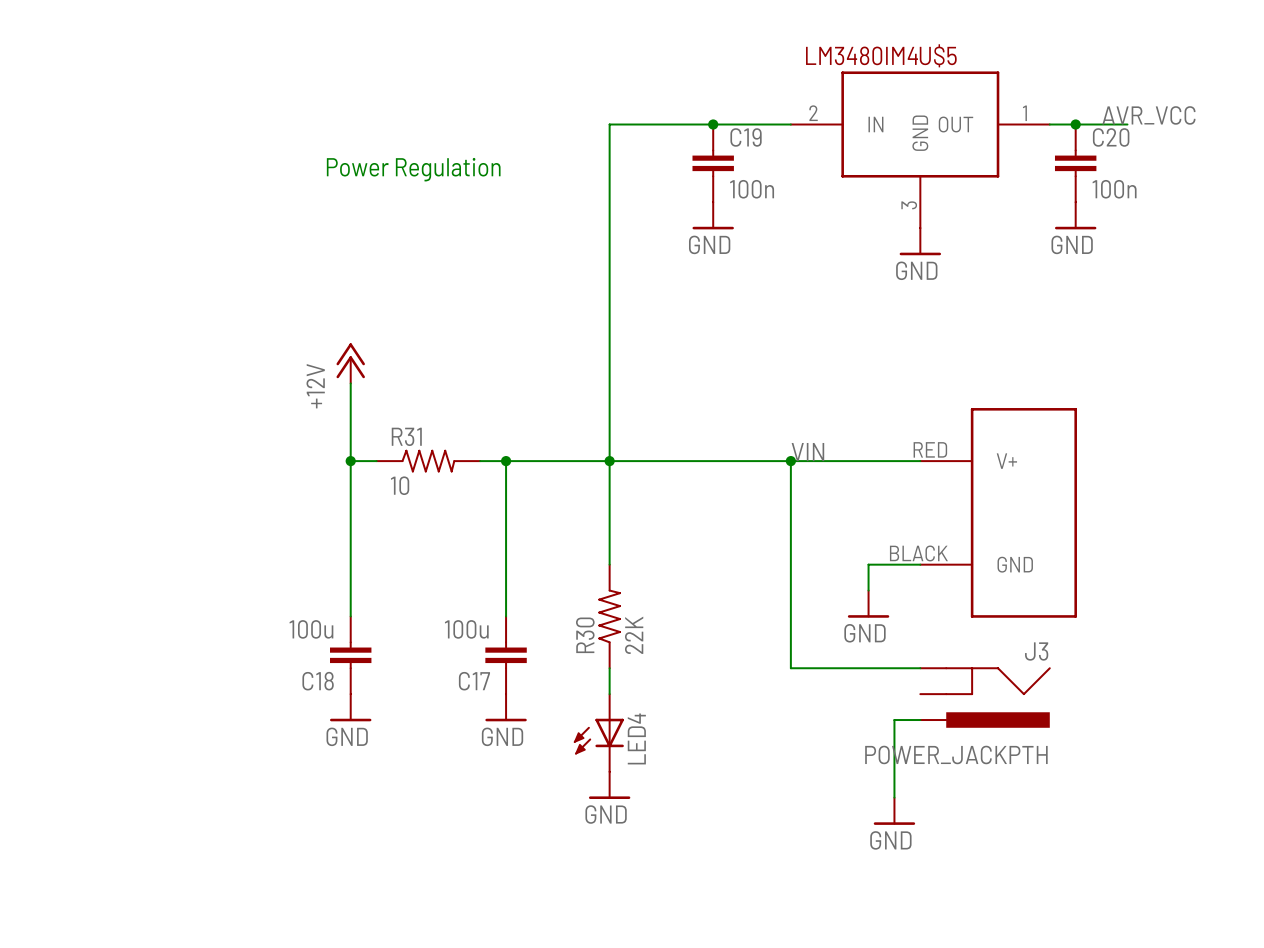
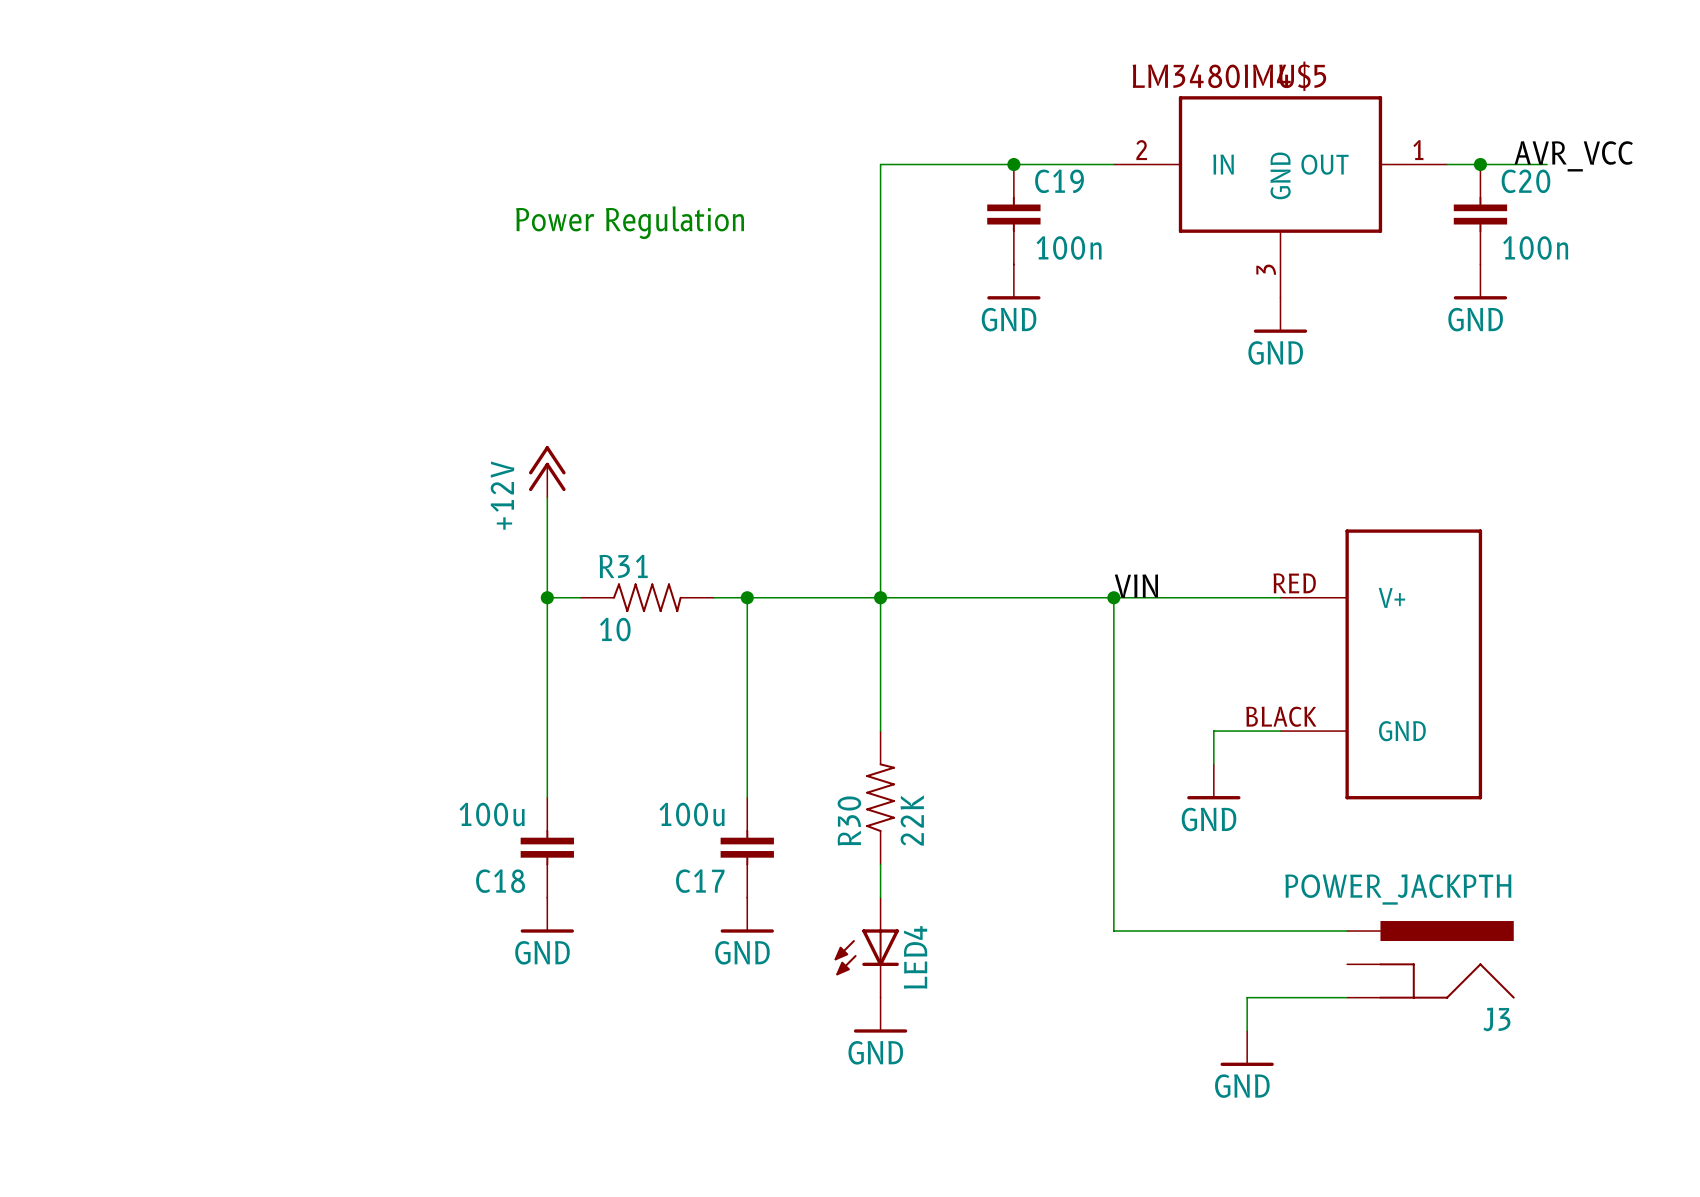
wire: (790, 668) (920, 668) -> (1113, 864) (1113, 931) (1247, 931)
J3 flip: as is (998, 697) -> up-down (1447, 959)
wire: (894, 720) (894, 771) -> (1347, 997) (1247, 997)

